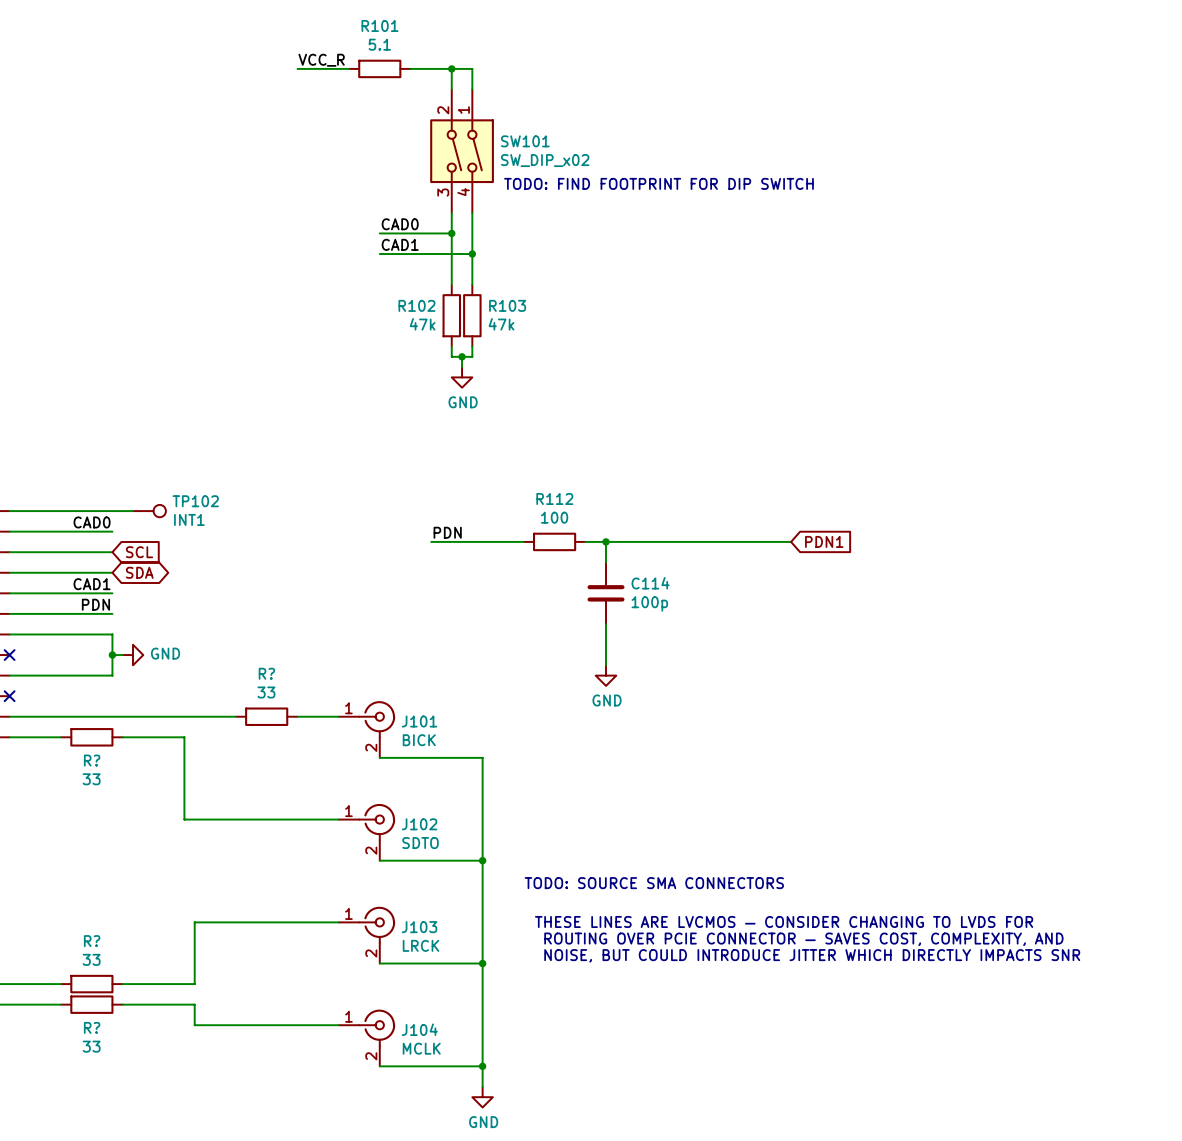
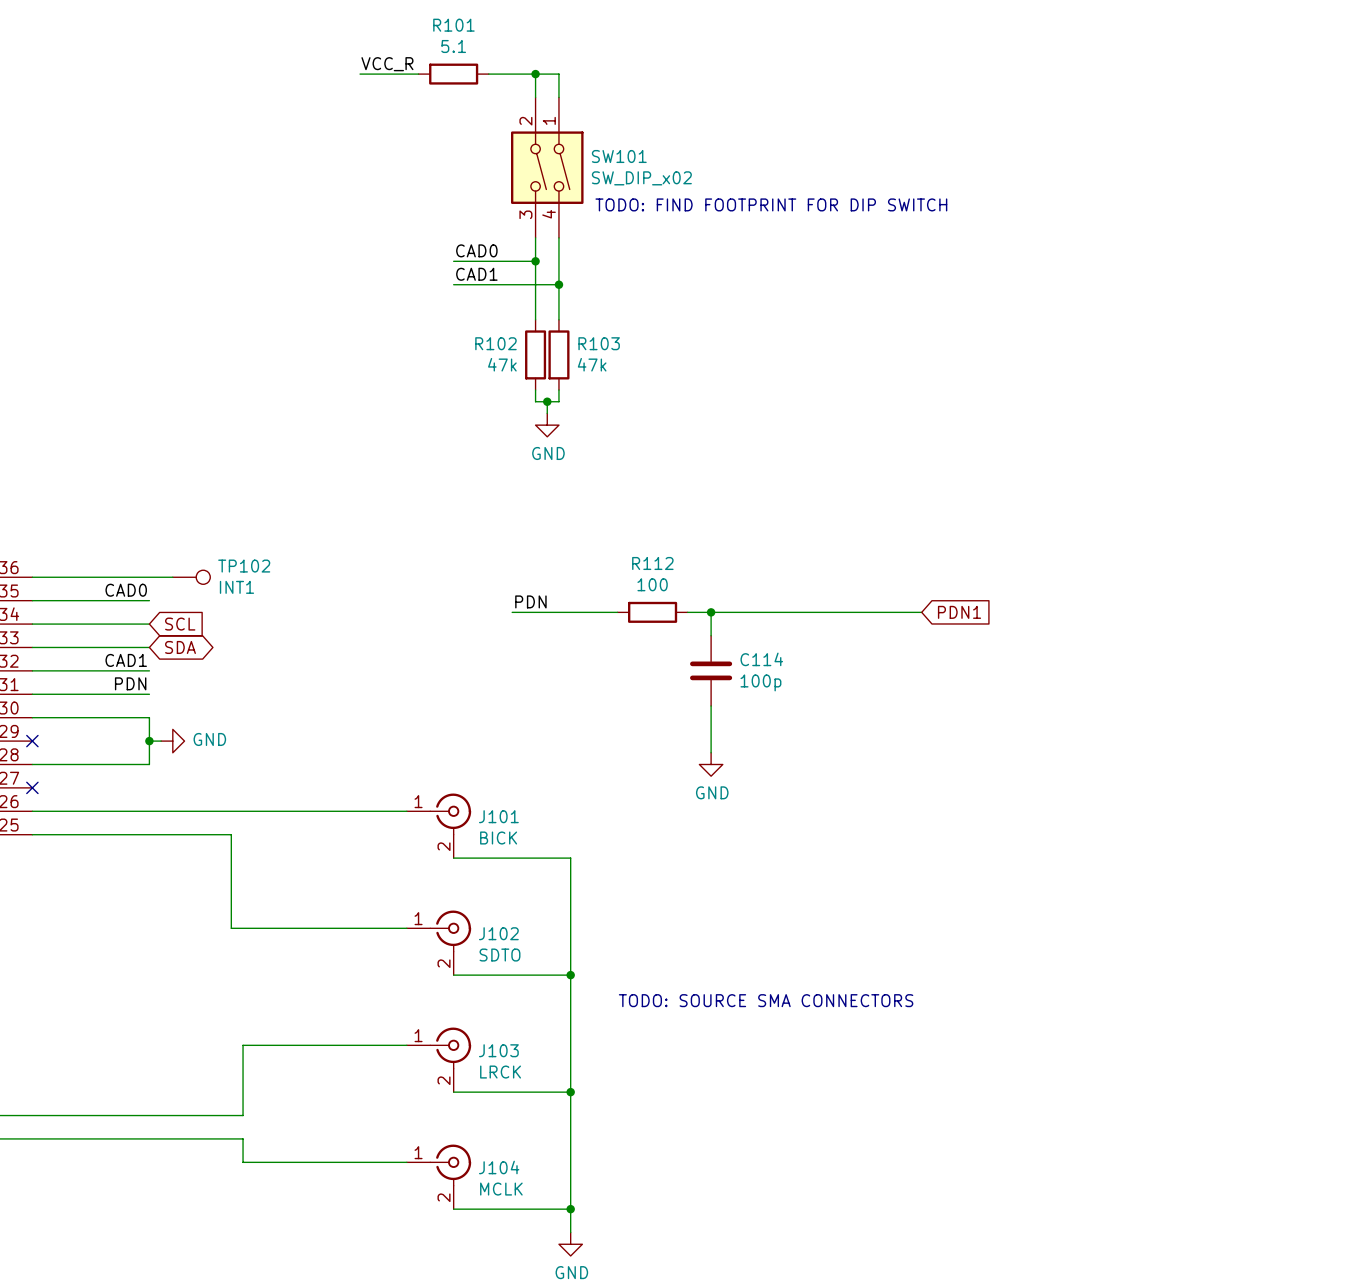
wire: none -> (289, 811) (360, 811)
R?: 33 (266, 716) -> none
wire: none -> (90, 834) (161, 834)
R?: 33 (91, 737) -> none
text: THESE LINES ARE LVCMOS — CONSIDER CHANGING TO LVDS FOR (784, 921) -> none
text: ROUTING OVER PCIE CONNECTOR — SAVES COST, COMPLEXITY, AND (803, 939) -> none
text: NOISE, BUT COULD INTRODUCE JITTER WHICH DIRECTLY IMPACTS SNR (812, 955) -> none
wire: none -> (90, 1115) (161, 1115)
R?: 33 (91, 984) -> none
wire: none -> (90, 1138) (161, 1138)
R?: 33 (91, 1004) -> none

